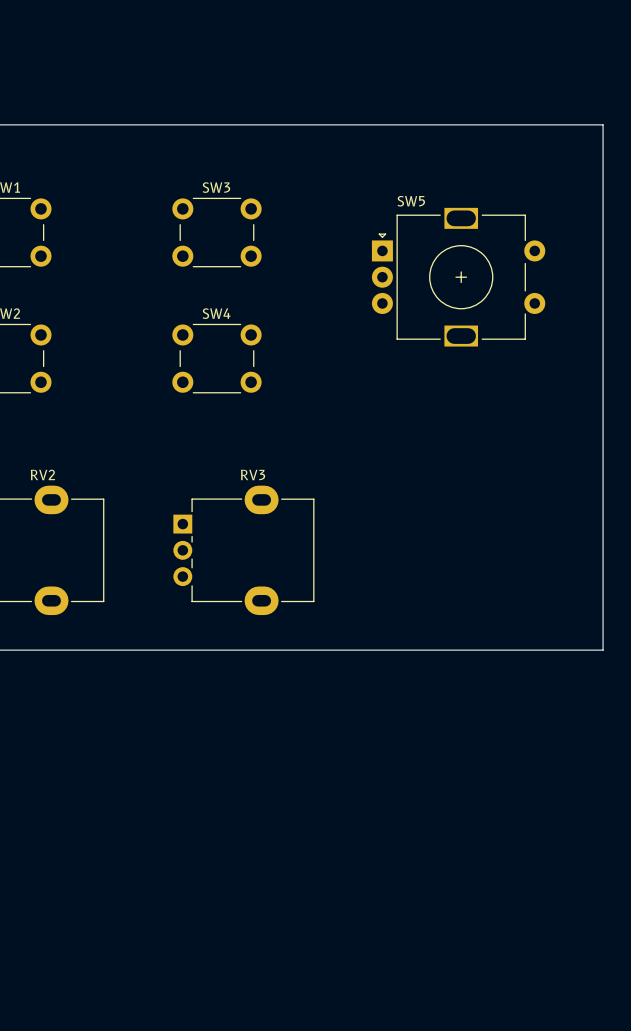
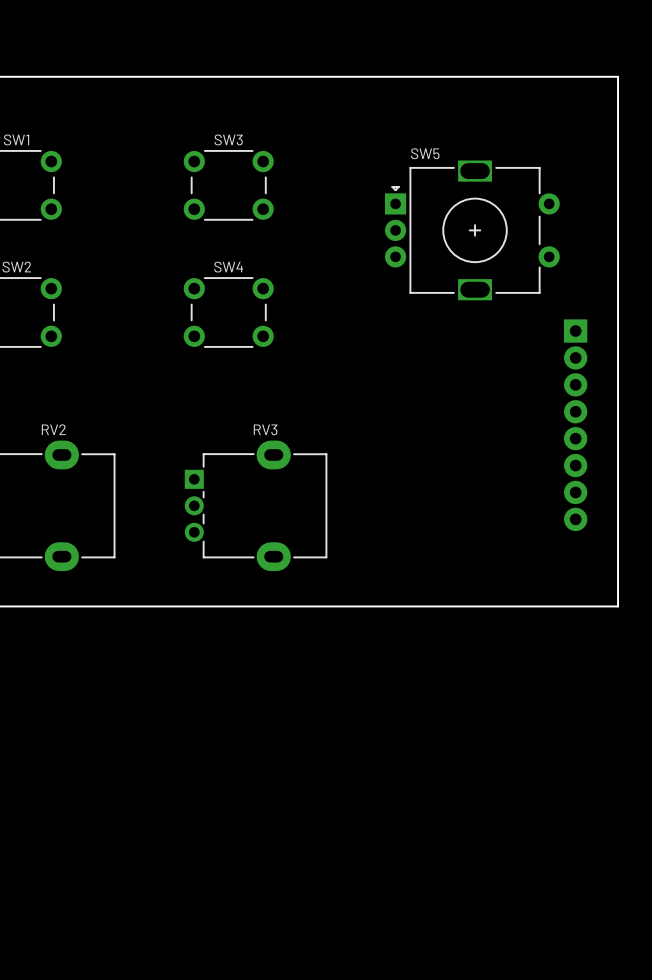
part: none -> (575, 425)

